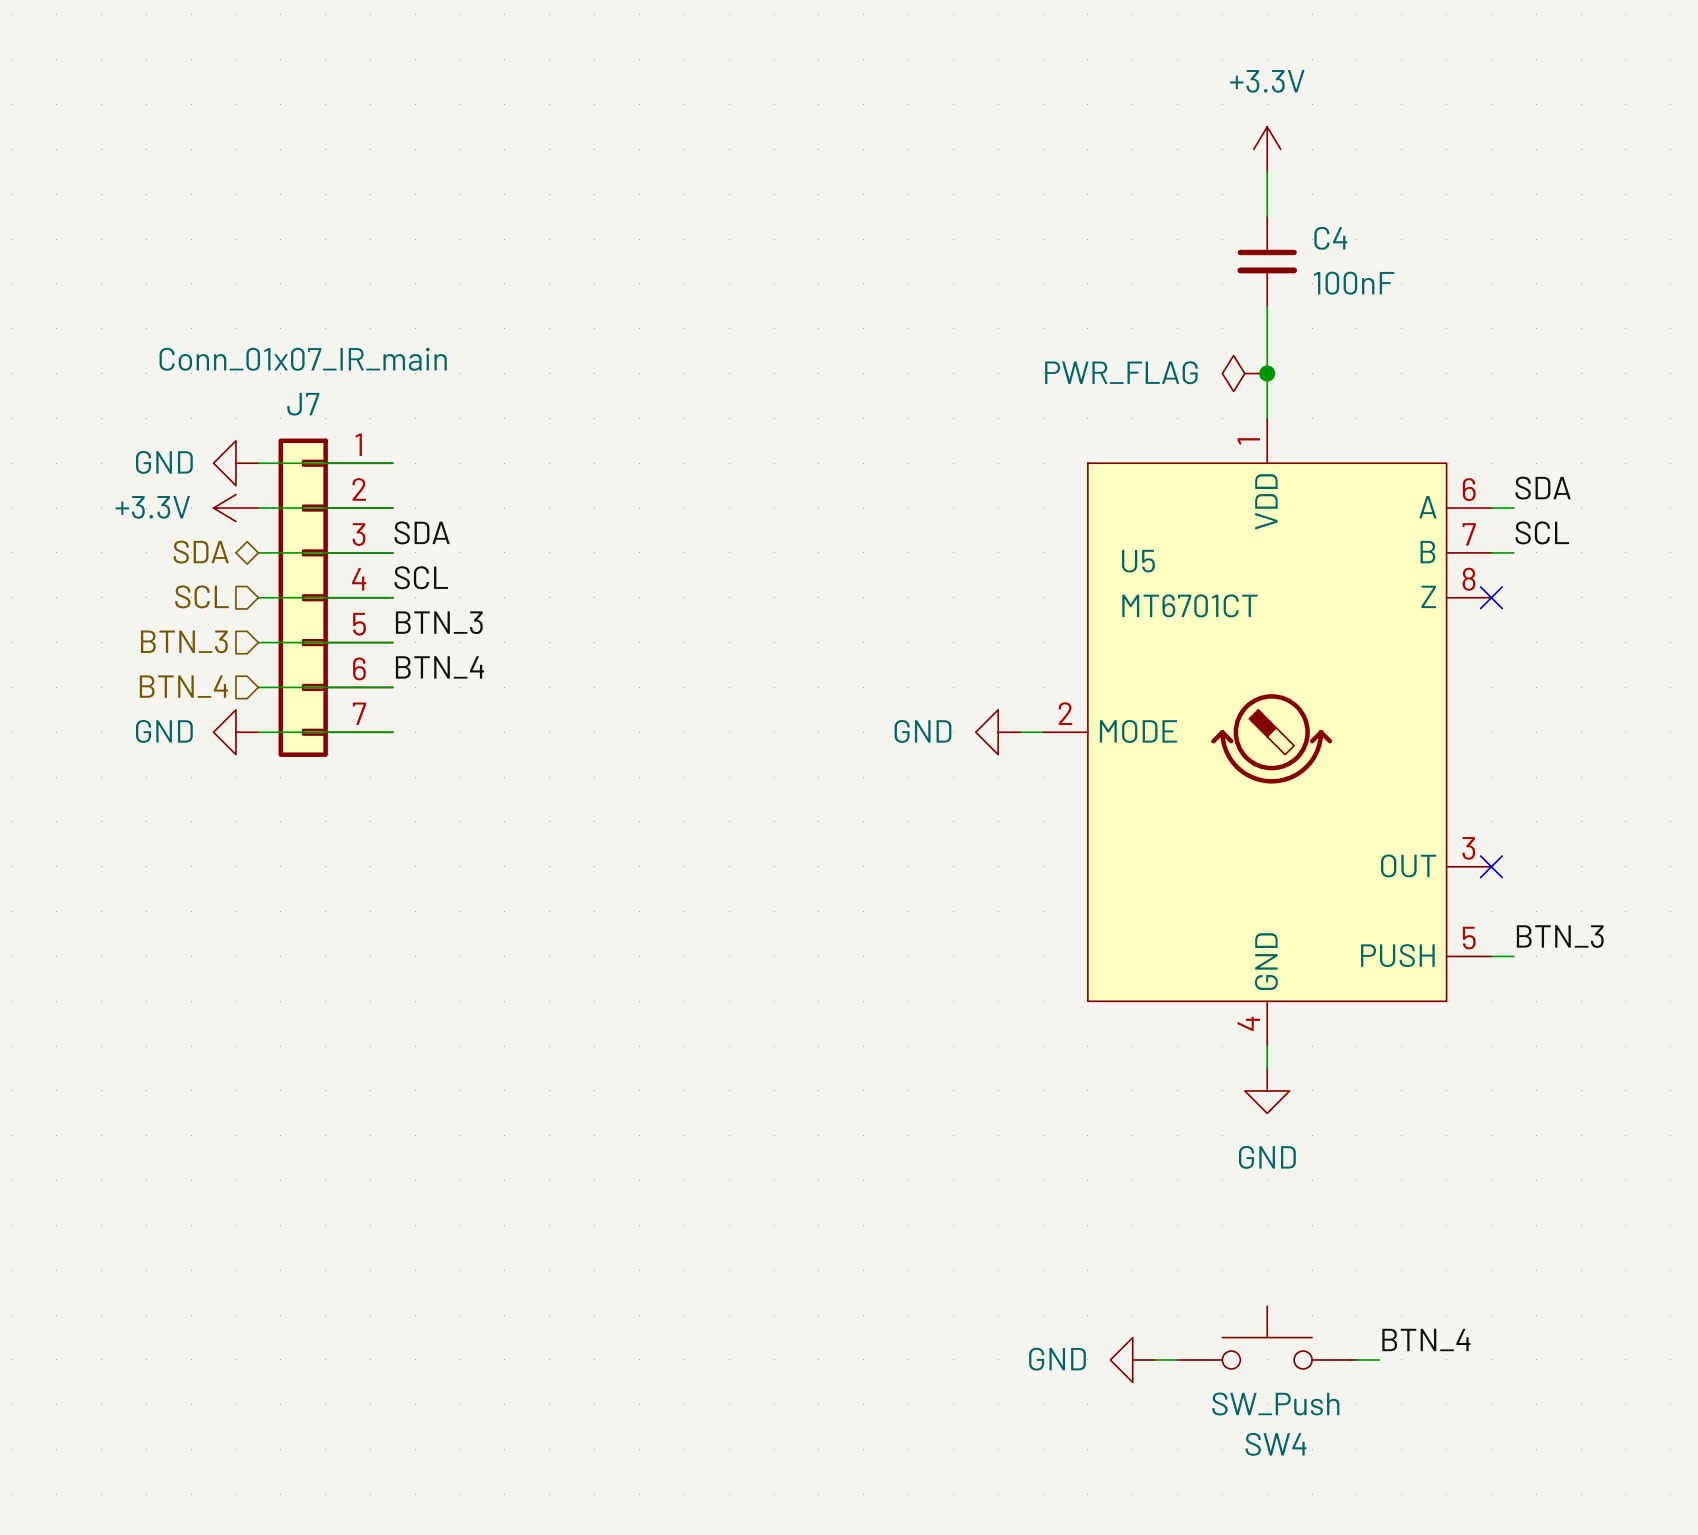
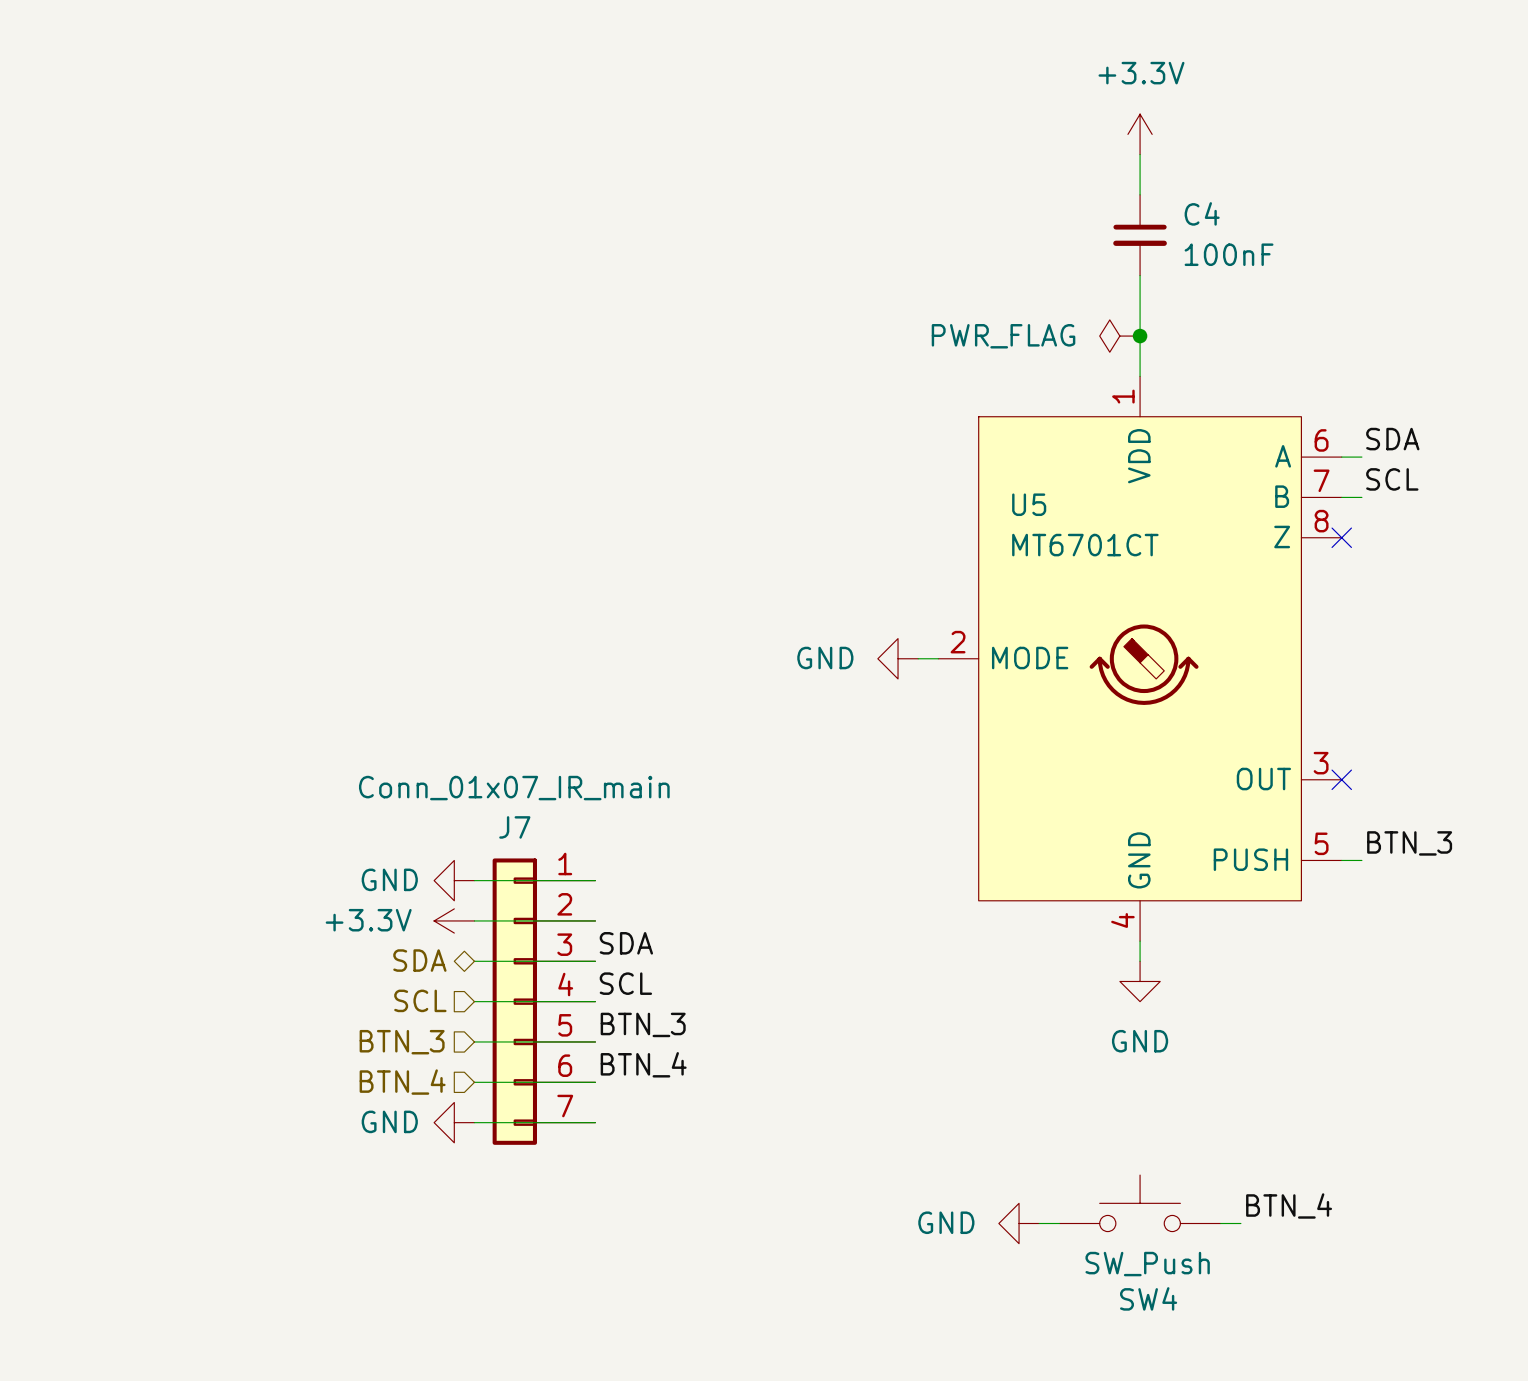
power symbol: GND (235, 463) -> none
wire: (258, 463) (392, 463) -> none
power symbol: +3.3V (235, 508) -> none
wire: (258, 508) (392, 508) -> none
label: SDA (422, 532) -> none
hierarchical label: SDA (201, 552) -> none
wire: (258, 552) (392, 552) -> none
label: SCL (421, 577) -> none
hierarchical label: SCL (201, 596) -> none
wire: (258, 597) (392, 597) -> none
J7 position: (335, 597) -> (544, 1001)
label: BTN_3 (439, 622) -> none
hierarchical label: BTN_3 (184, 641) -> none
wire: (258, 642) (392, 642) -> (474, 880) (595, 880)
label: BTN_4 (439, 667) -> none
hierarchical label: BTN_4 (183, 686) -> none
wire: (258, 687) (392, 687) -> (474, 920) (595, 920)
power symbol: GND (235, 732) -> none
wire: (258, 732) (392, 732) -> (474, 961) (595, 961)
power symbol: none -> GND (454, 880)
power symbol: none -> +3.3V (454, 920)
label: none -> SDA (626, 943)
hierarchical label: none -> SDA (419, 960)
label: none -> SCL (625, 983)
hierarchical label: none -> SCL (420, 1000)
wire: none -> (474, 1001) (595, 1001)
label: none -> BTN_3 (643, 1024)
hierarchical label: none -> BTN_3 (402, 1042)
wire: none -> (474, 1041) (595, 1041)
label: none -> BTN_4 (643, 1064)
hierarchical label: none -> BTN_4 (402, 1082)
wire: none -> (474, 1082) (595, 1082)
power symbol: none -> GND (454, 1122)
wire: none -> (474, 1122) (595, 1122)

